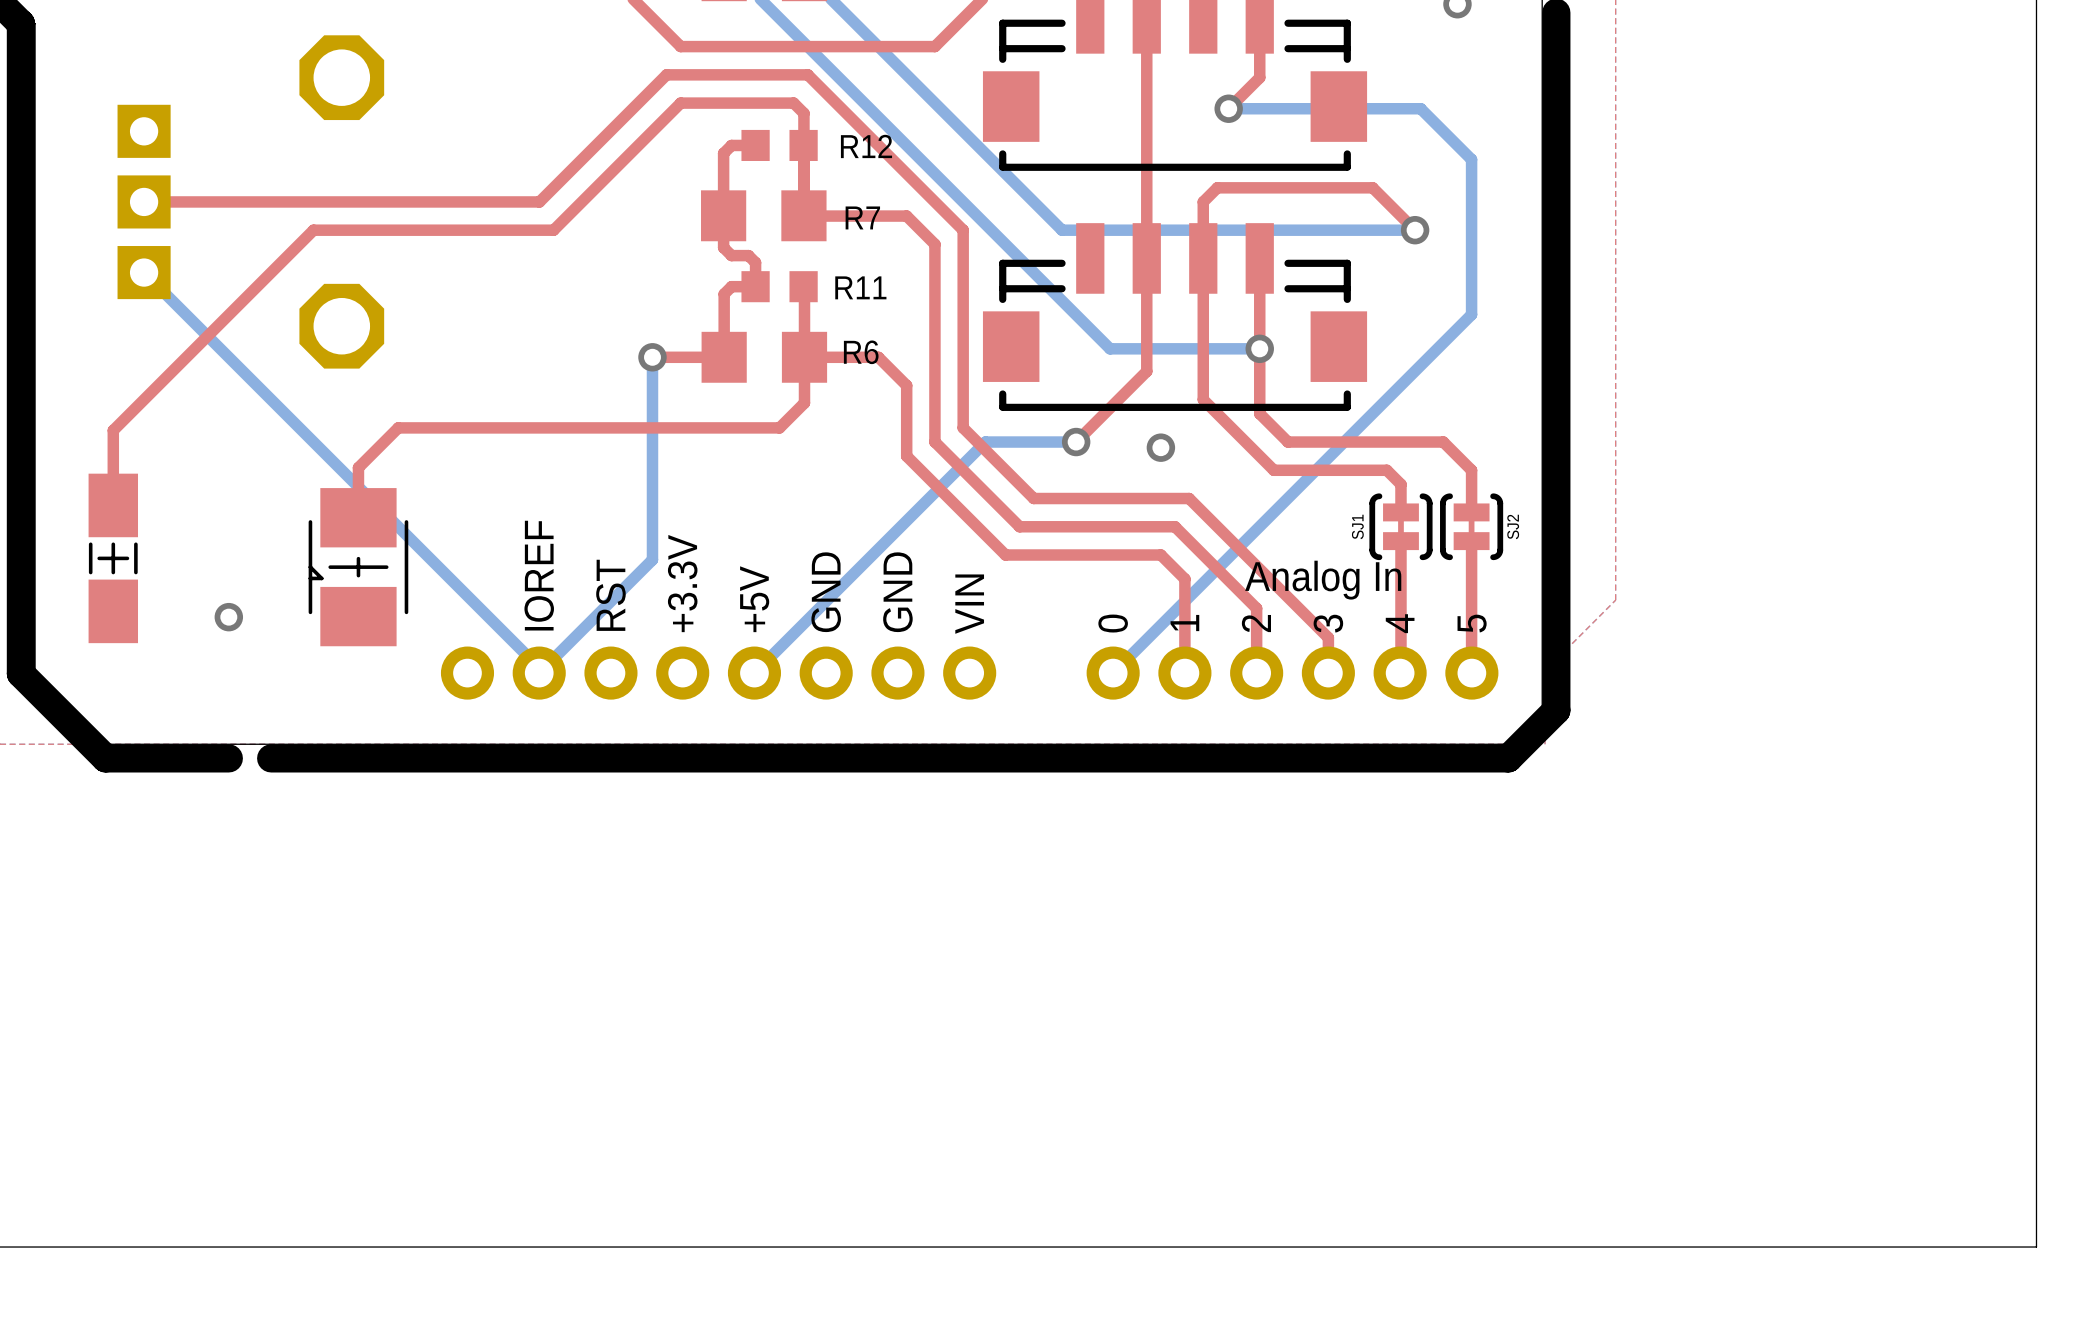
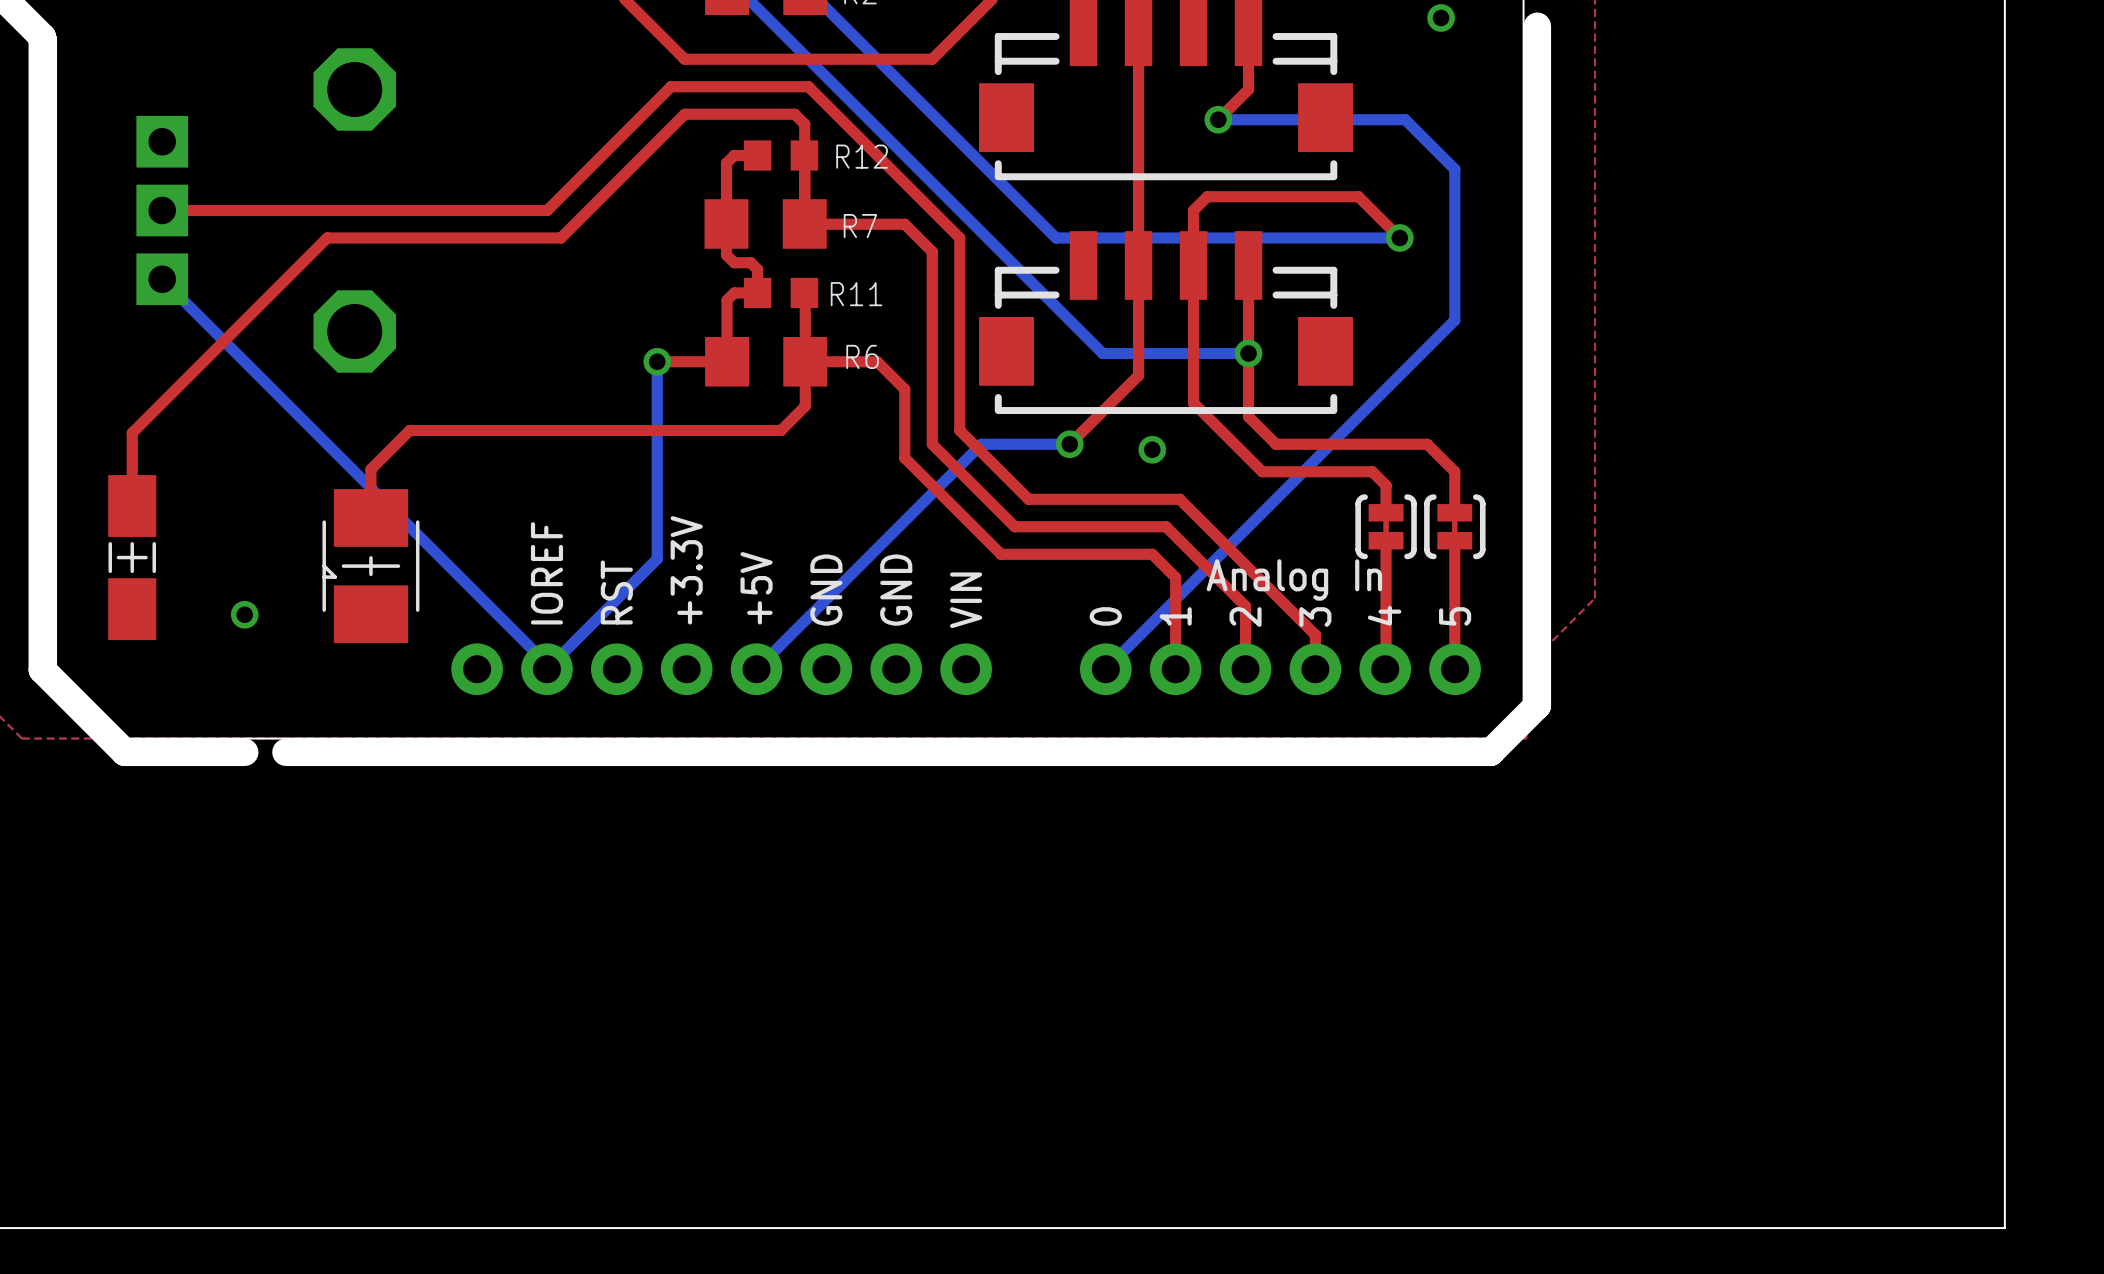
SJ1 name: SJ1 (1357, 526) -> none
SJ2 name: SJ2 (1513, 526) -> none

